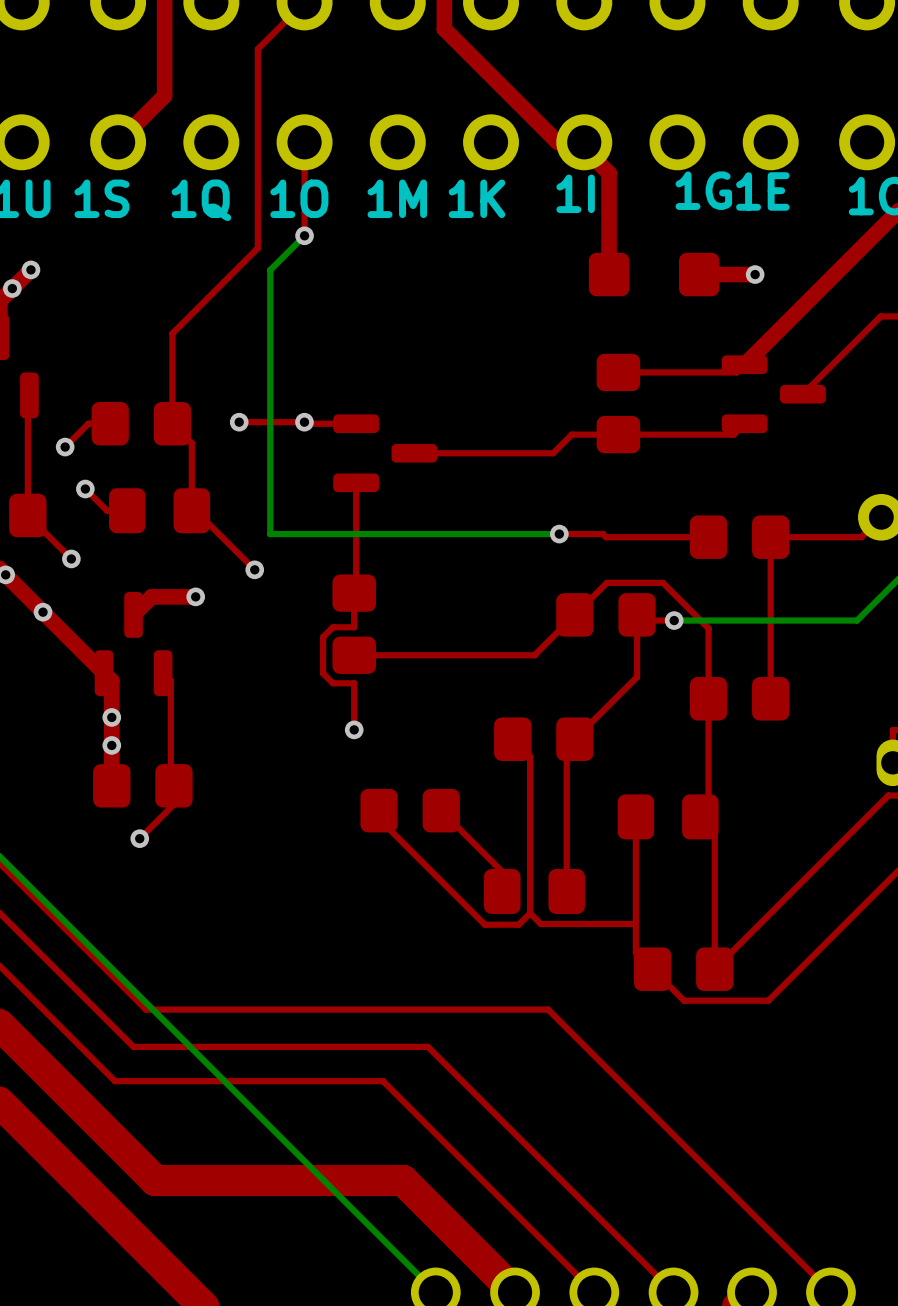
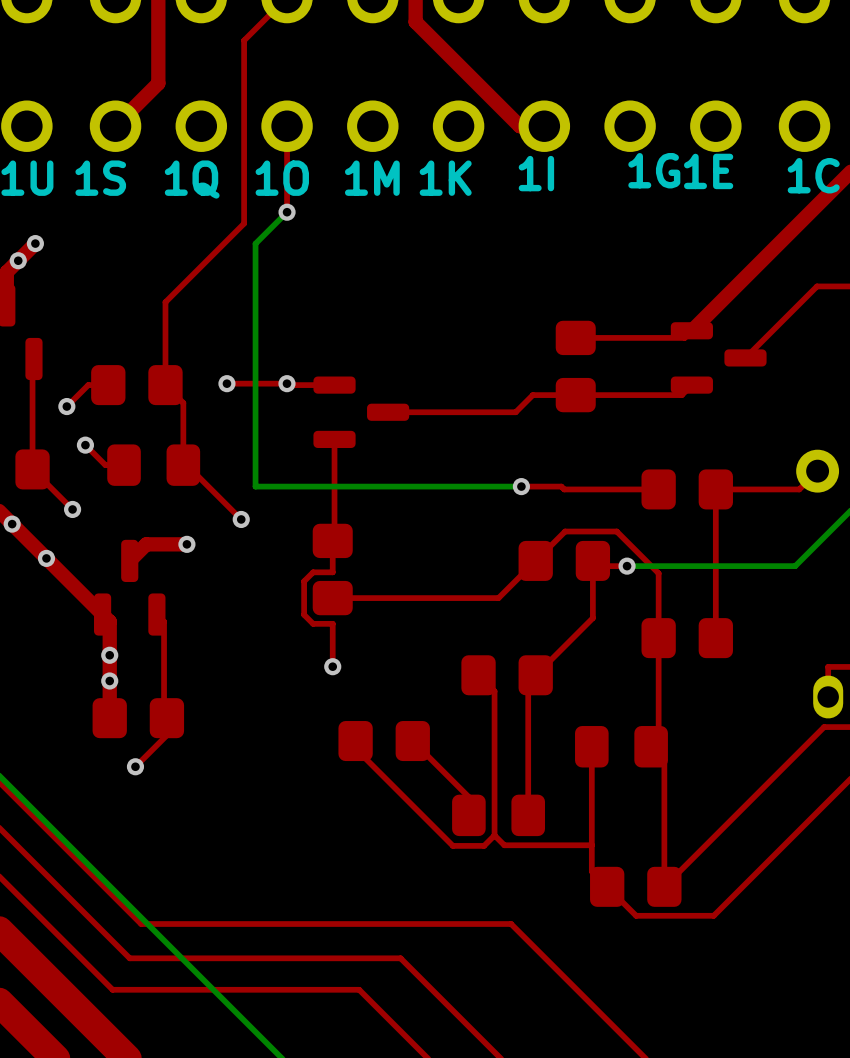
top track: (578, 142) (609, 173) (609, 274) -> none
part: (654, 274) -> none
top track: (755, 274) (699, 274) -> none
via: (755, 274) -> none

